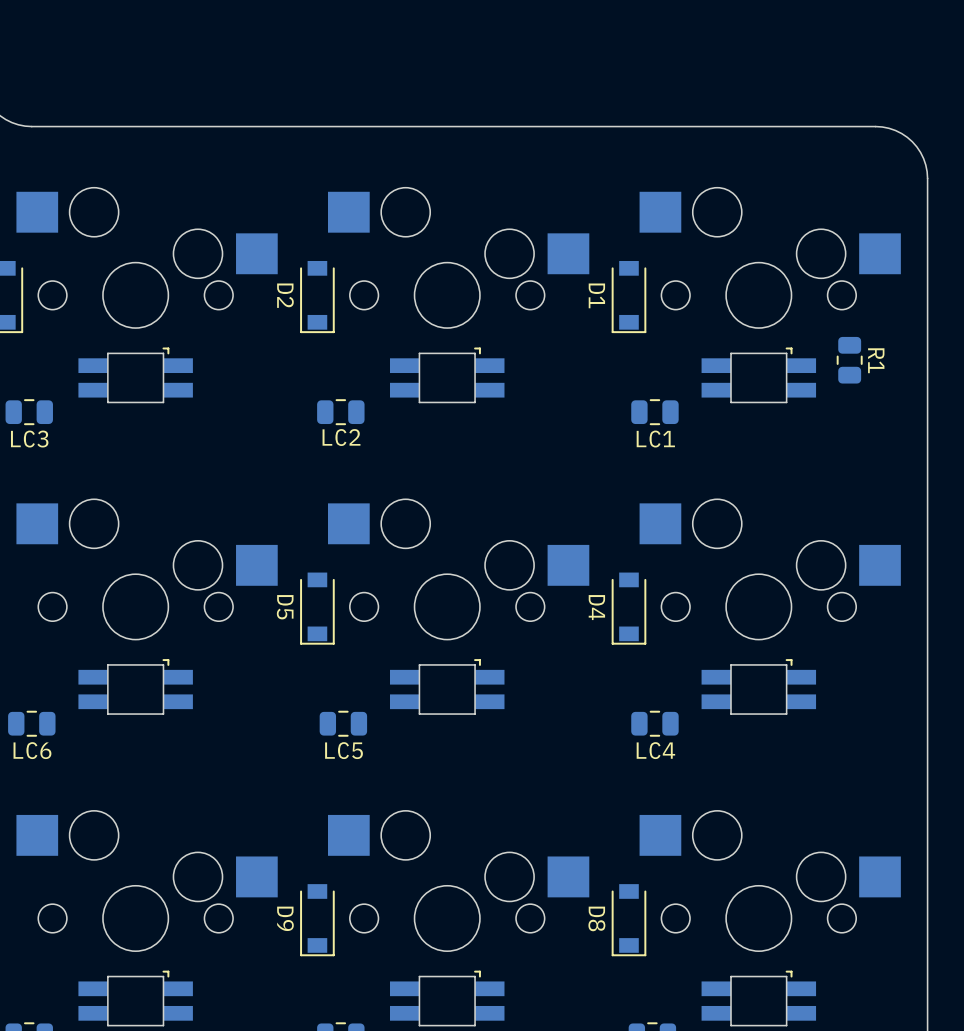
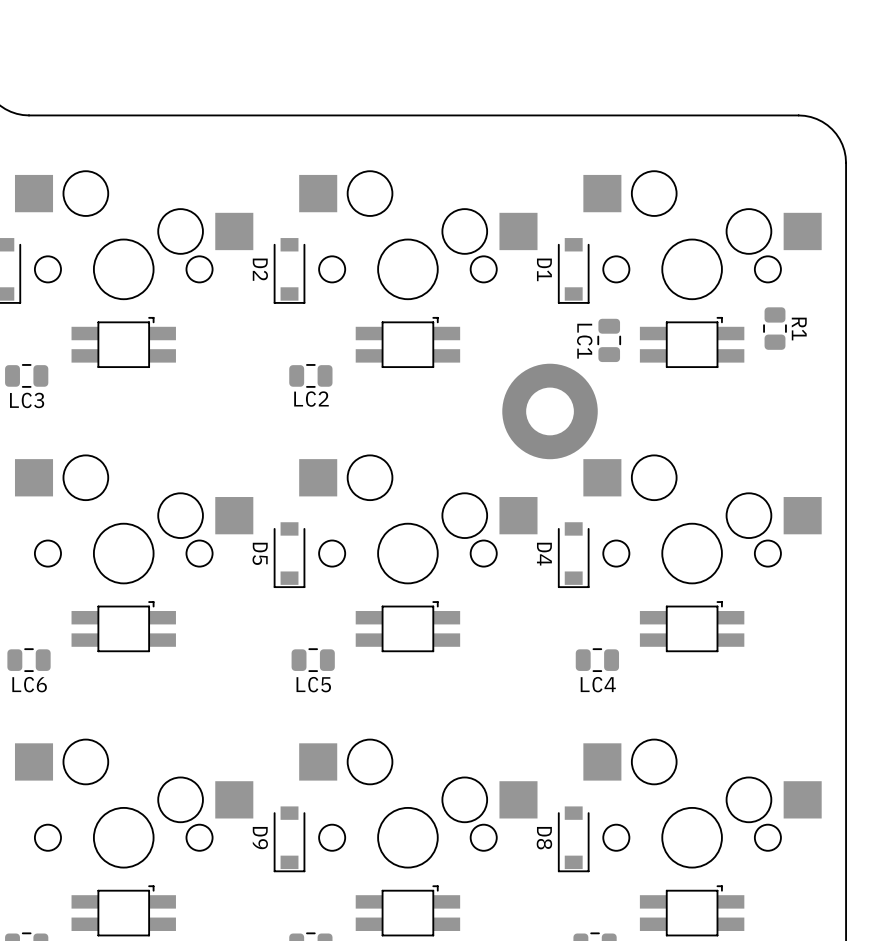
LC1 rotation: 0° (654, 412) -> 90° clockwise (609, 340)
LC1 position: (654, 412) -> (609, 340)
part: none -> (550, 411)

